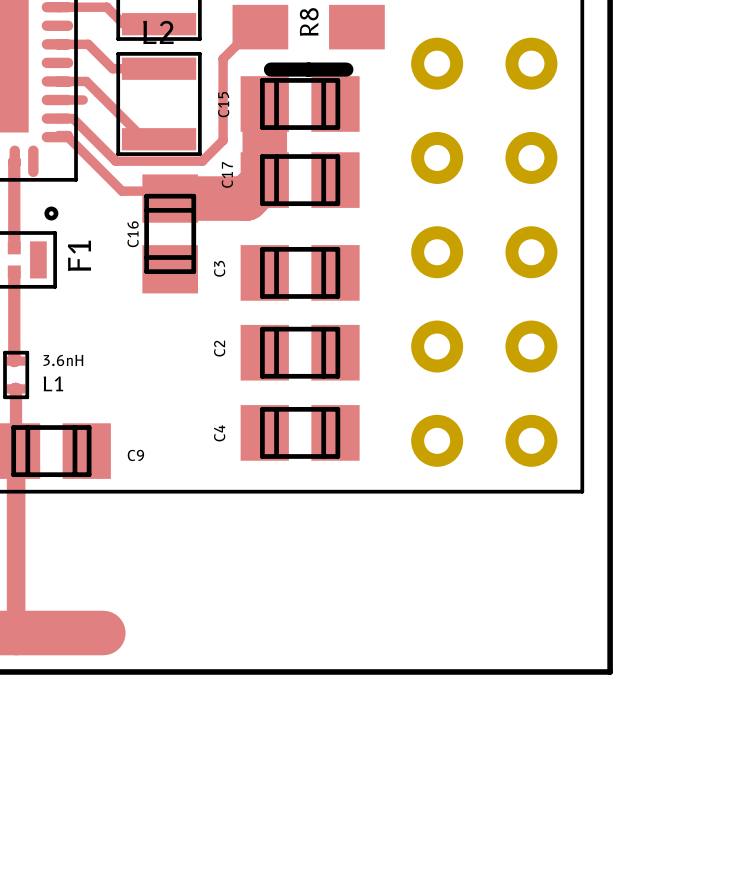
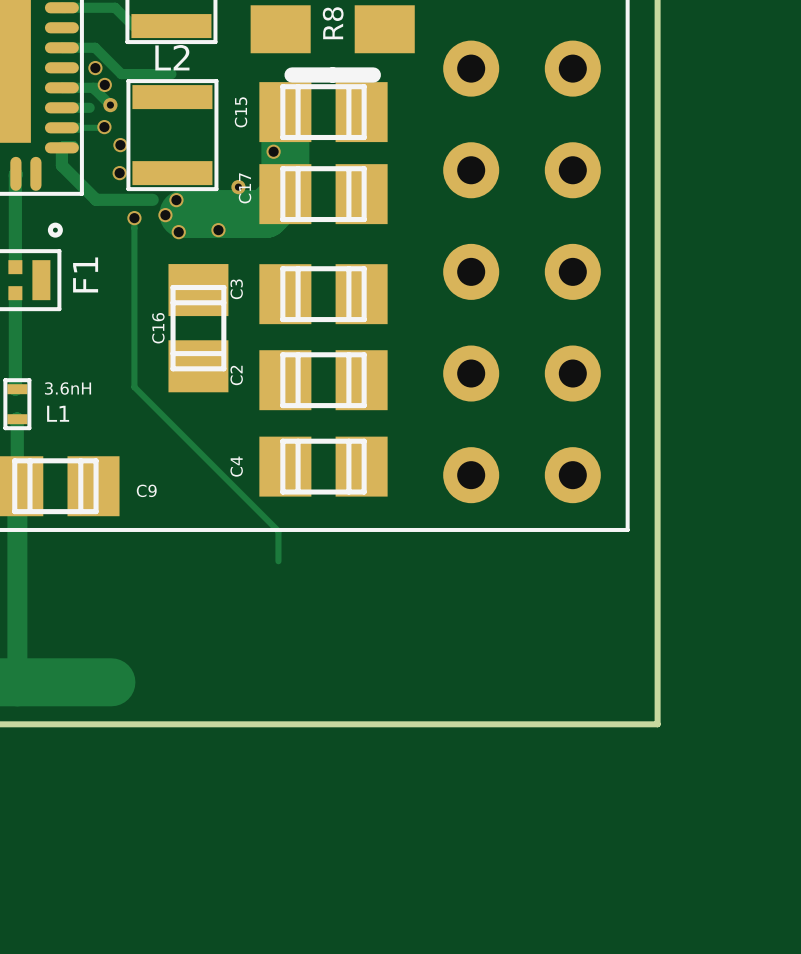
track: (254, 27) (223, 58) (223, 140) (202, 161) (115, 161) (73, 118) -> (104, 127) (78, 127)
via: none -> (95, 68)
via: none -> (104, 84)
track: (102, 97) (145, 140) (159, 139) -> none
via: none -> (110, 105)
L2 position: (159, 103) -> (172, 135)
via: none -> (104, 127)
via: none -> (120, 145)
track: none -> (61, 147) (61, 165) (96, 199) (152, 199)
track: (68, 137) (122, 191) (172, 191) -> none
via: none -> (273, 151)
via: none -> (119, 173)
via: none -> (238, 187)
via: none -> (176, 200)
via: none -> (165, 215)
track: none -> (134, 218) (134, 387) (278, 531) (278, 561)
via: none -> (134, 218)
via: none -> (218, 230)
via: none -> (178, 232)
C16 position: (170, 233) -> (198, 328)

